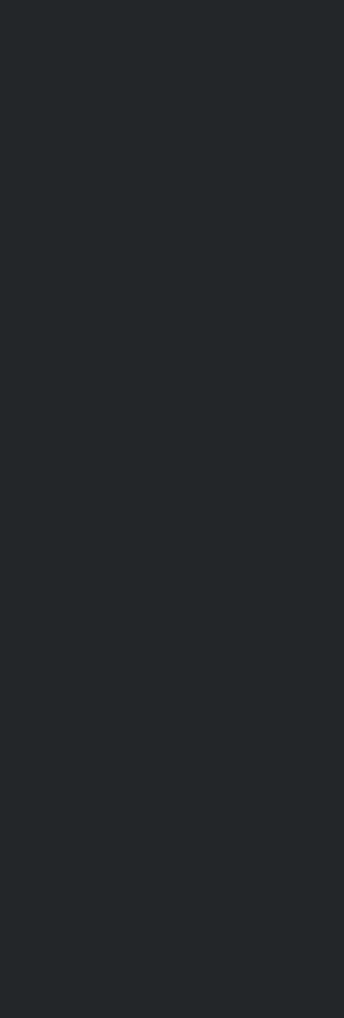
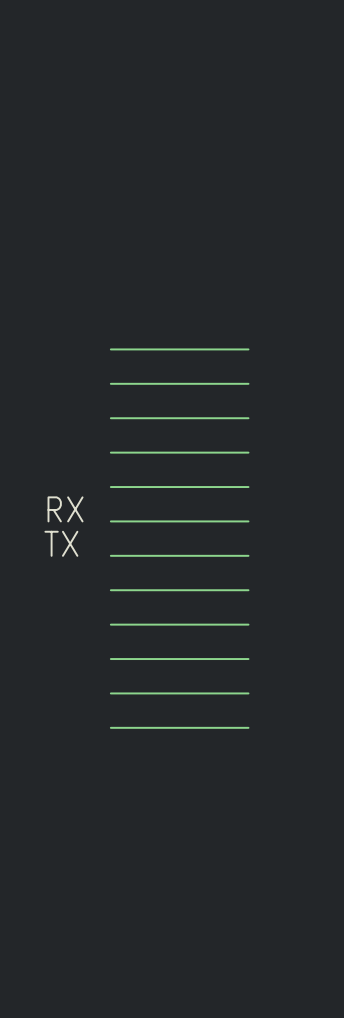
wire: none -> (110, 349) (248, 349)
wire: none -> (110, 383) (248, 383)
wire: none -> (110, 418) (248, 418)
wire: none -> (110, 452) (248, 452)
wire: none -> (110, 487) (248, 487)
label: none -> RX (65, 509)
wire: none -> (110, 521) (248, 521)
label: none -> TX (61, 543)
wire: none -> (110, 555) (248, 555)
wire: none -> (110, 590) (248, 590)
wire: none -> (110, 624) (248, 624)
wire: none -> (110, 659) (248, 659)
wire: none -> (110, 693) (248, 693)
wire: none -> (110, 727) (248, 727)

